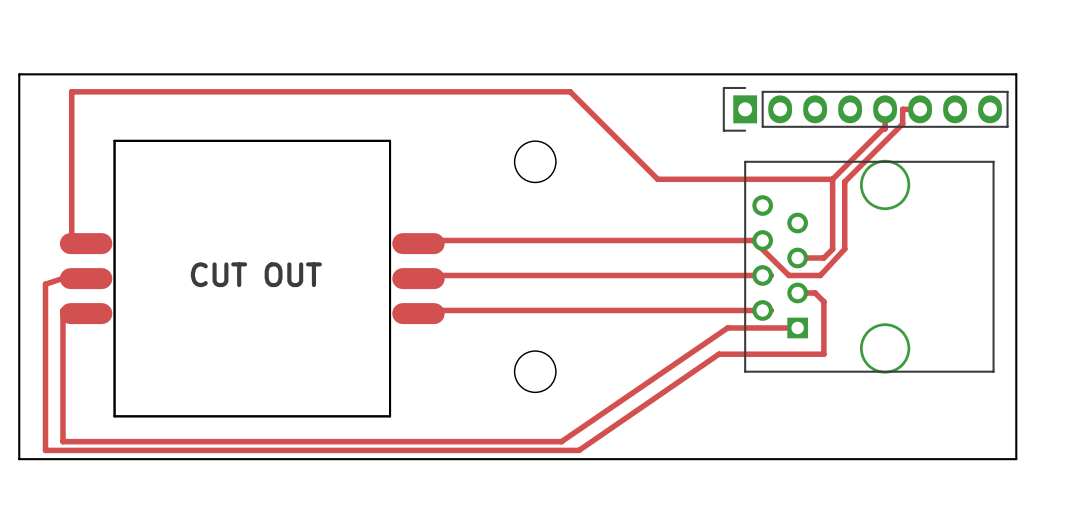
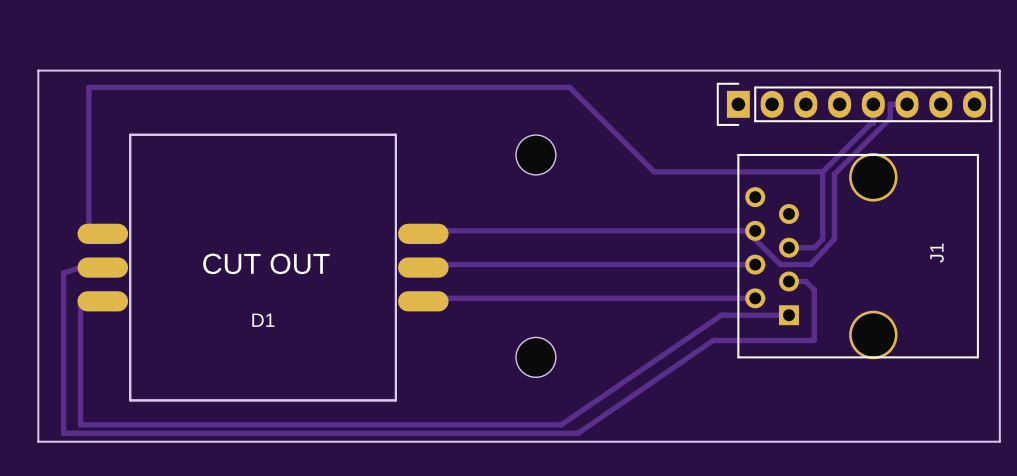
J1 name: none -> J1 (937, 253)
D1 name: none -> D1 (263, 320)

